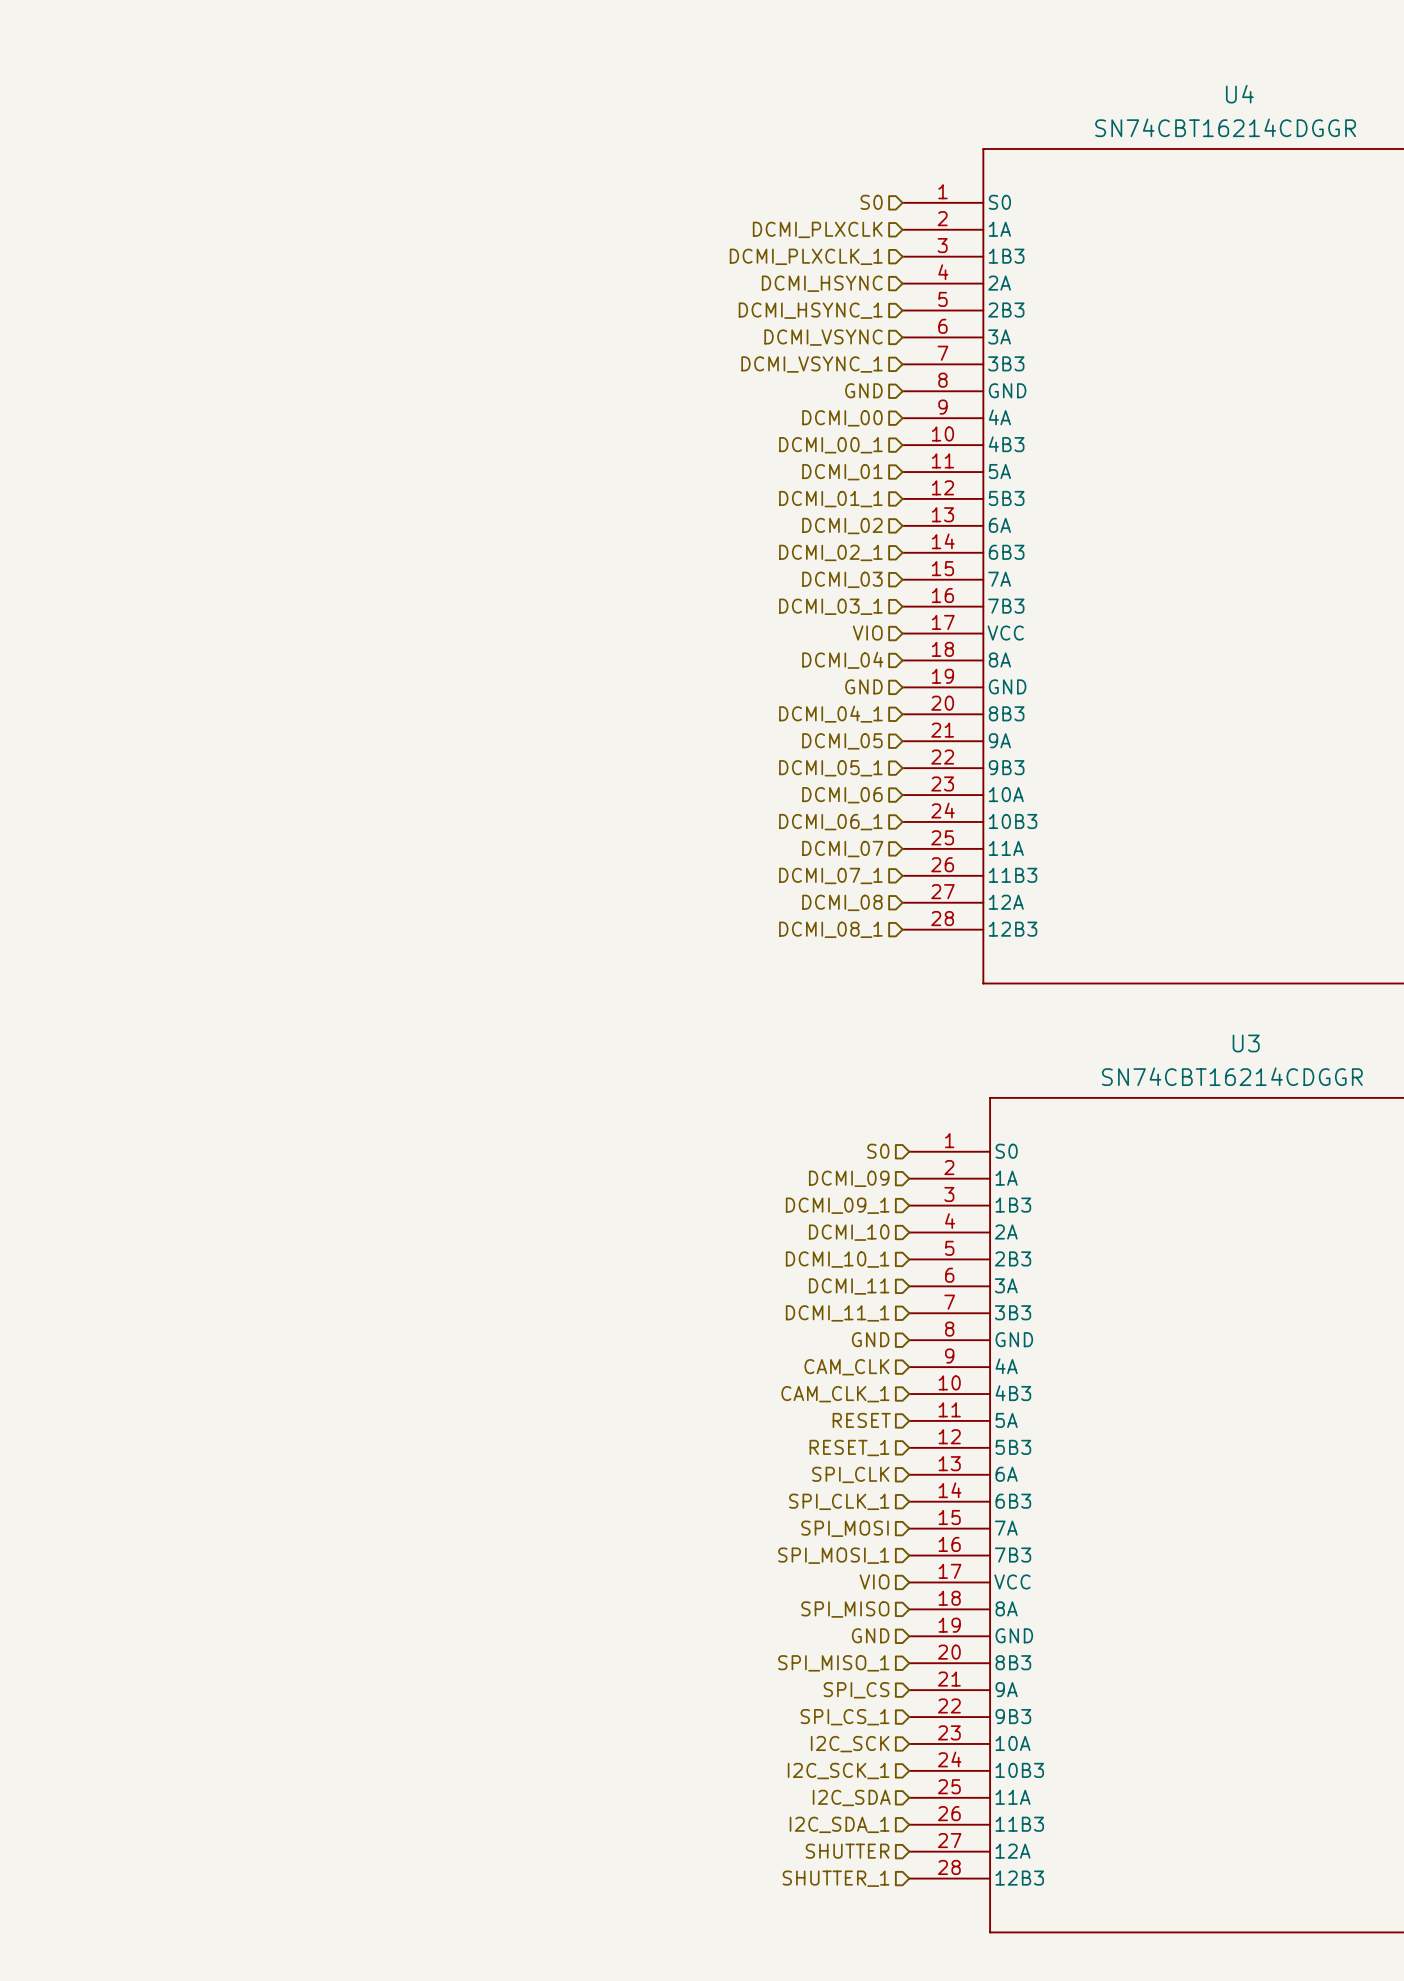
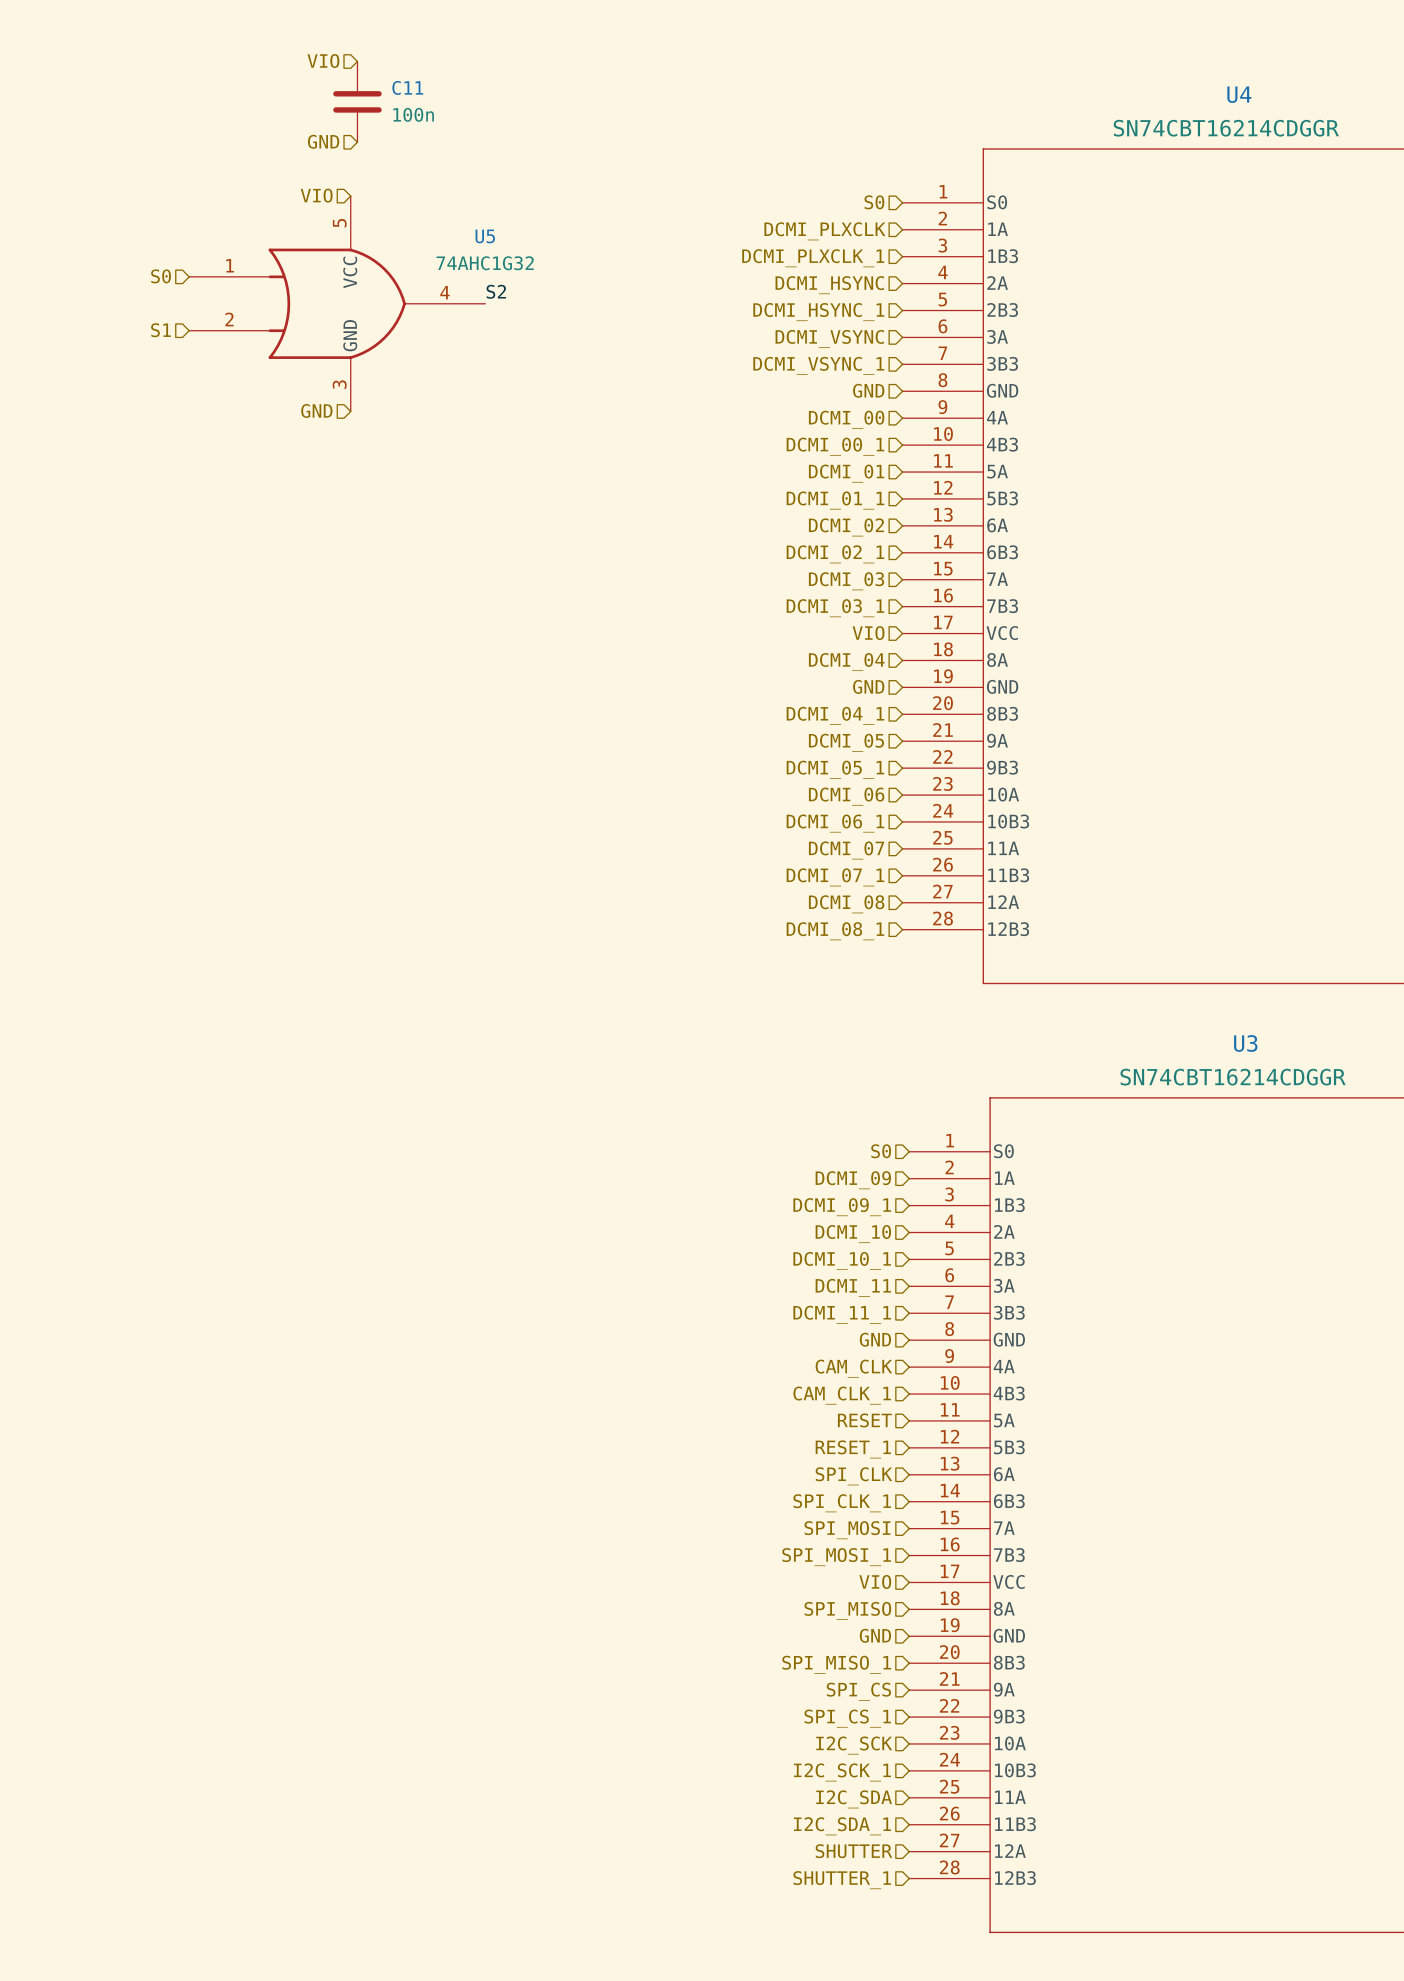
hierarchical label: none -> VIO (323, 61)
C11: none -> 100n (357, 101)
hierarchical label: none -> GND (323, 141)
hierarchical label: none -> VIO (316, 195)
hierarchical label: none -> S0 (161, 276)
label: none -> S2 (496, 291)
U5: none -> 74AHC1G32 (337, 303)
hierarchical label: none -> S1 (161, 330)
hierarchical label: none -> GND (316, 410)

